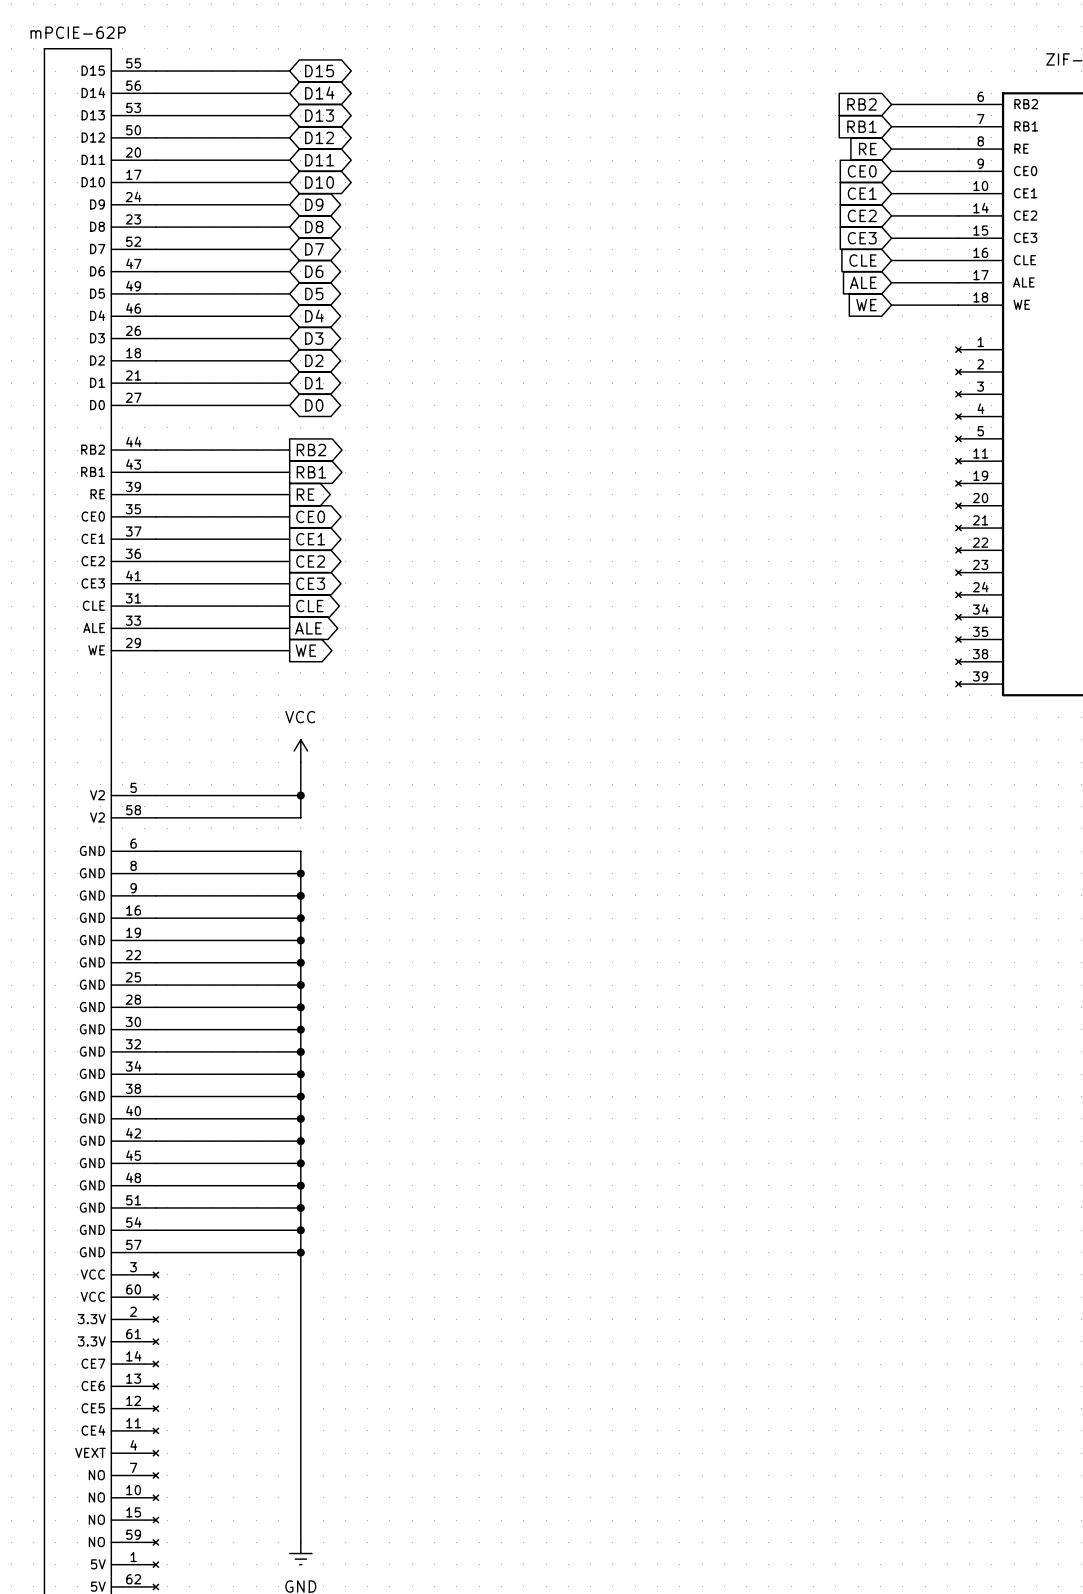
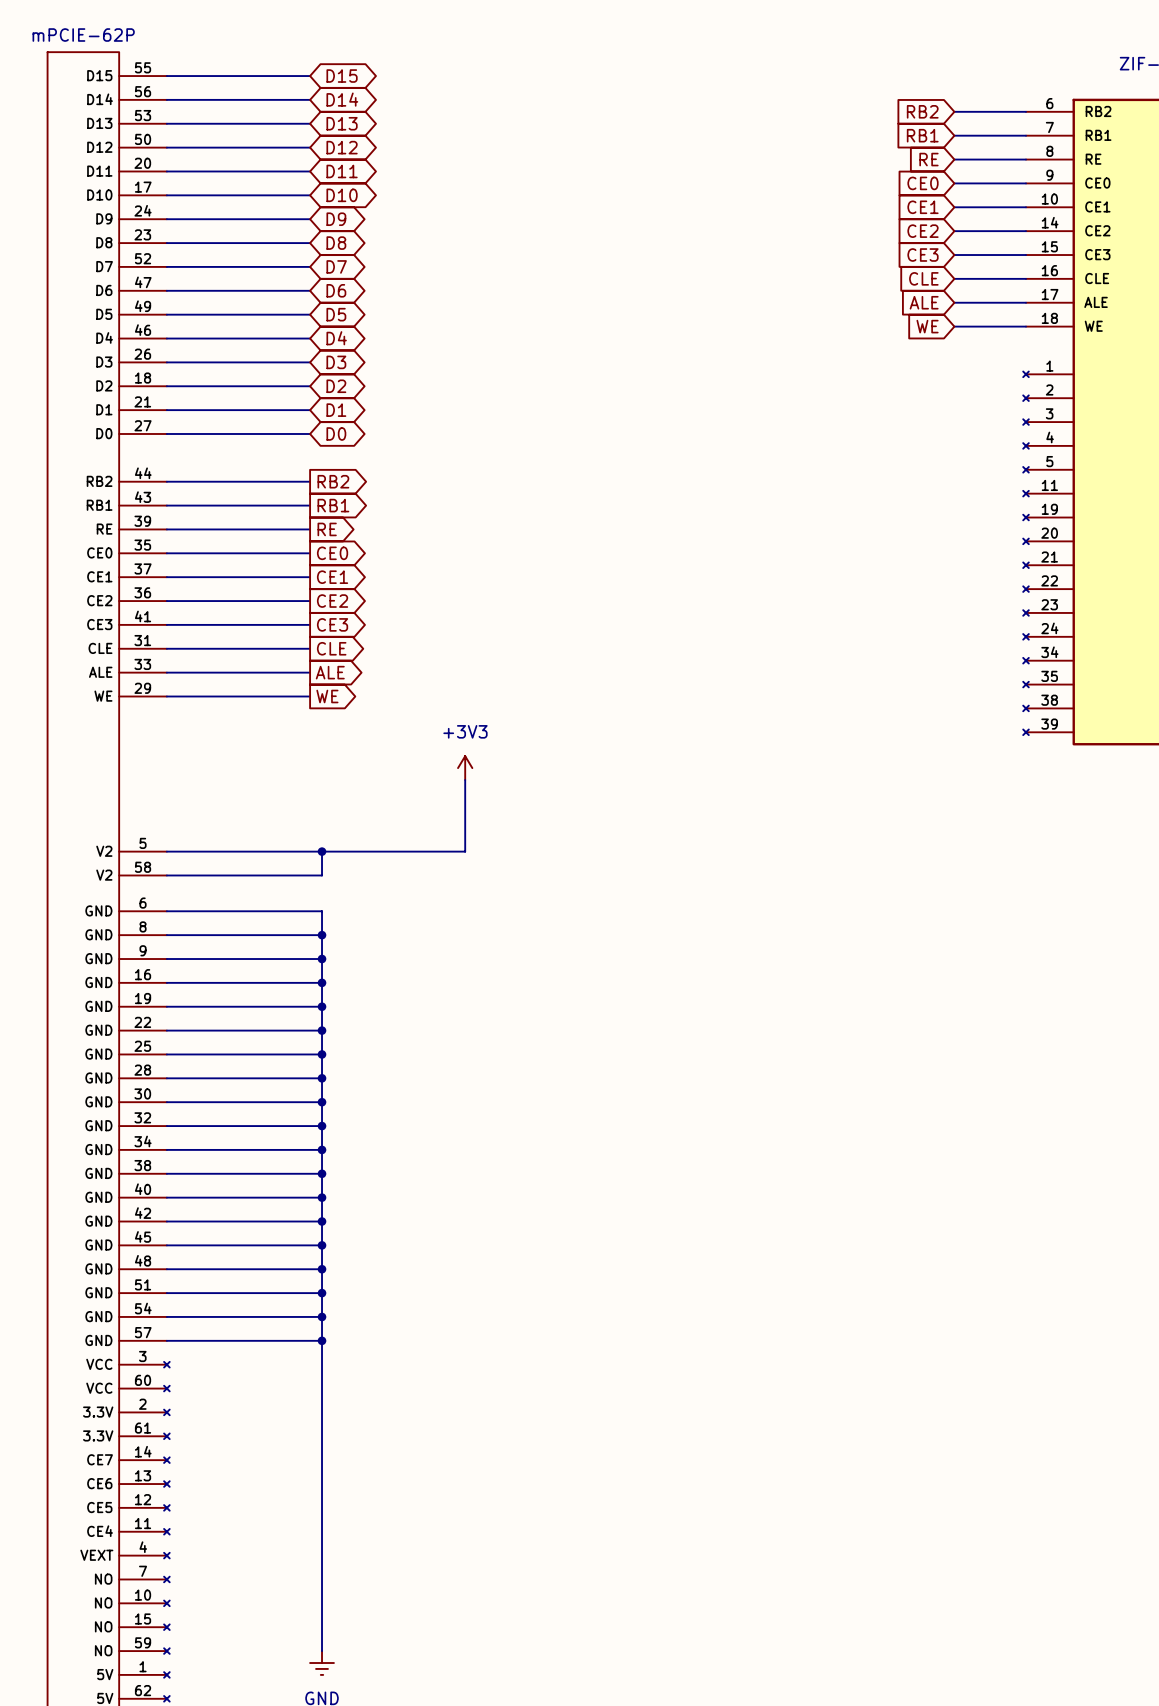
power symbol: none -> +3V3 (465, 768)
power symbol: VCC (300, 750) -> none
wire: (300, 762) (300, 795) -> (465, 780) (465, 851) (322, 851)

